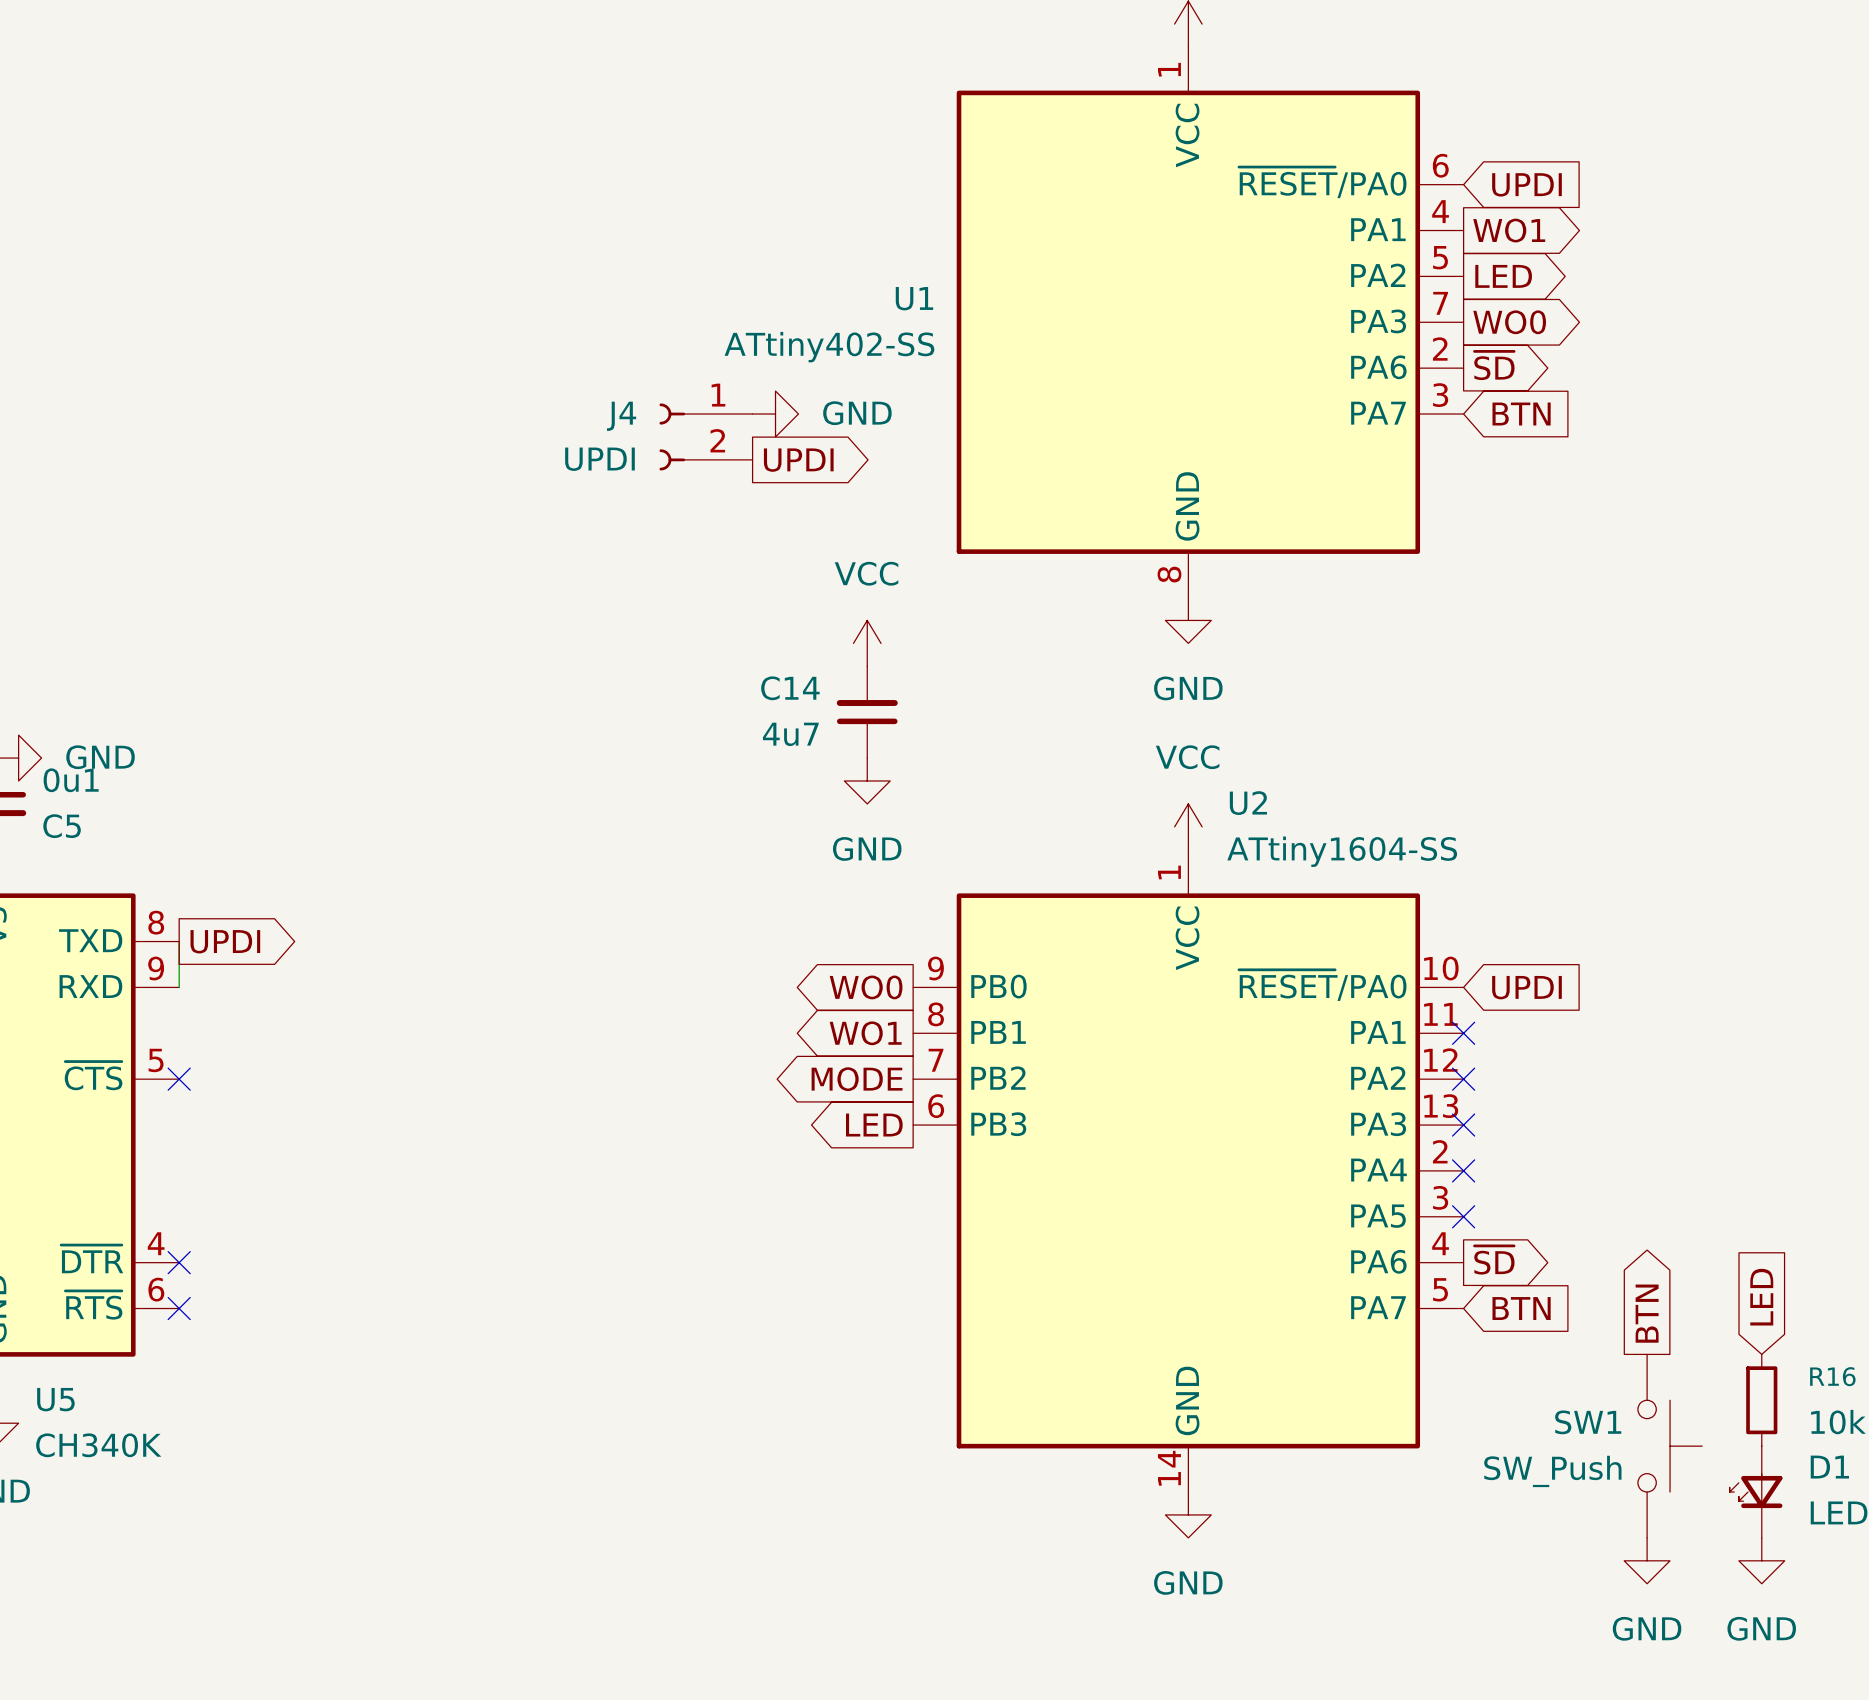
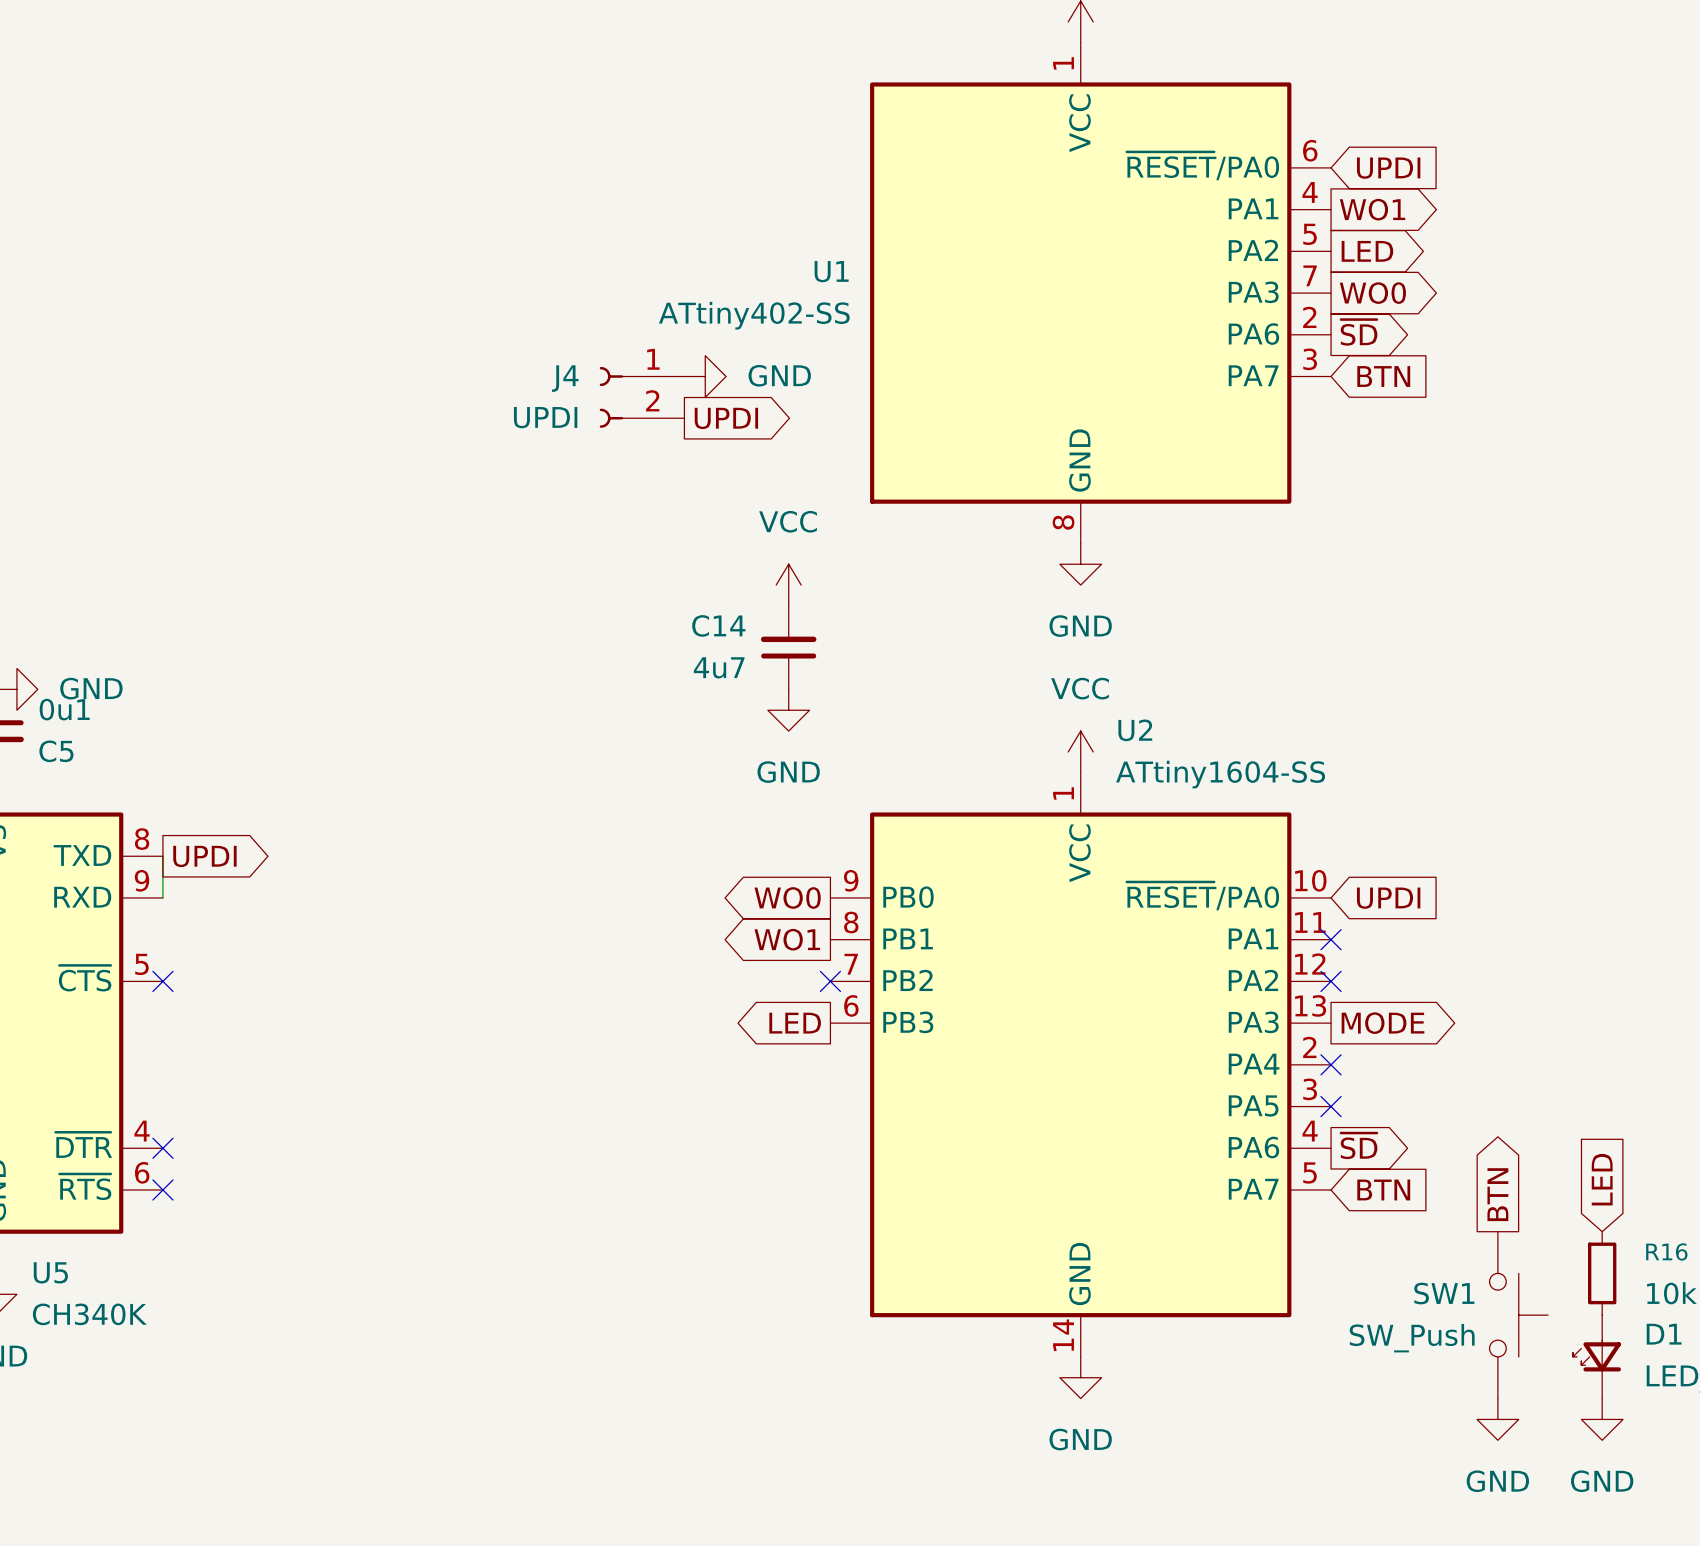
global label: MODE (857, 1079) -> none
no-connect mark: none -> (830, 981)
no-connect mark: (1463, 1125) -> none
global label: none -> MODE (1382, 1023)

